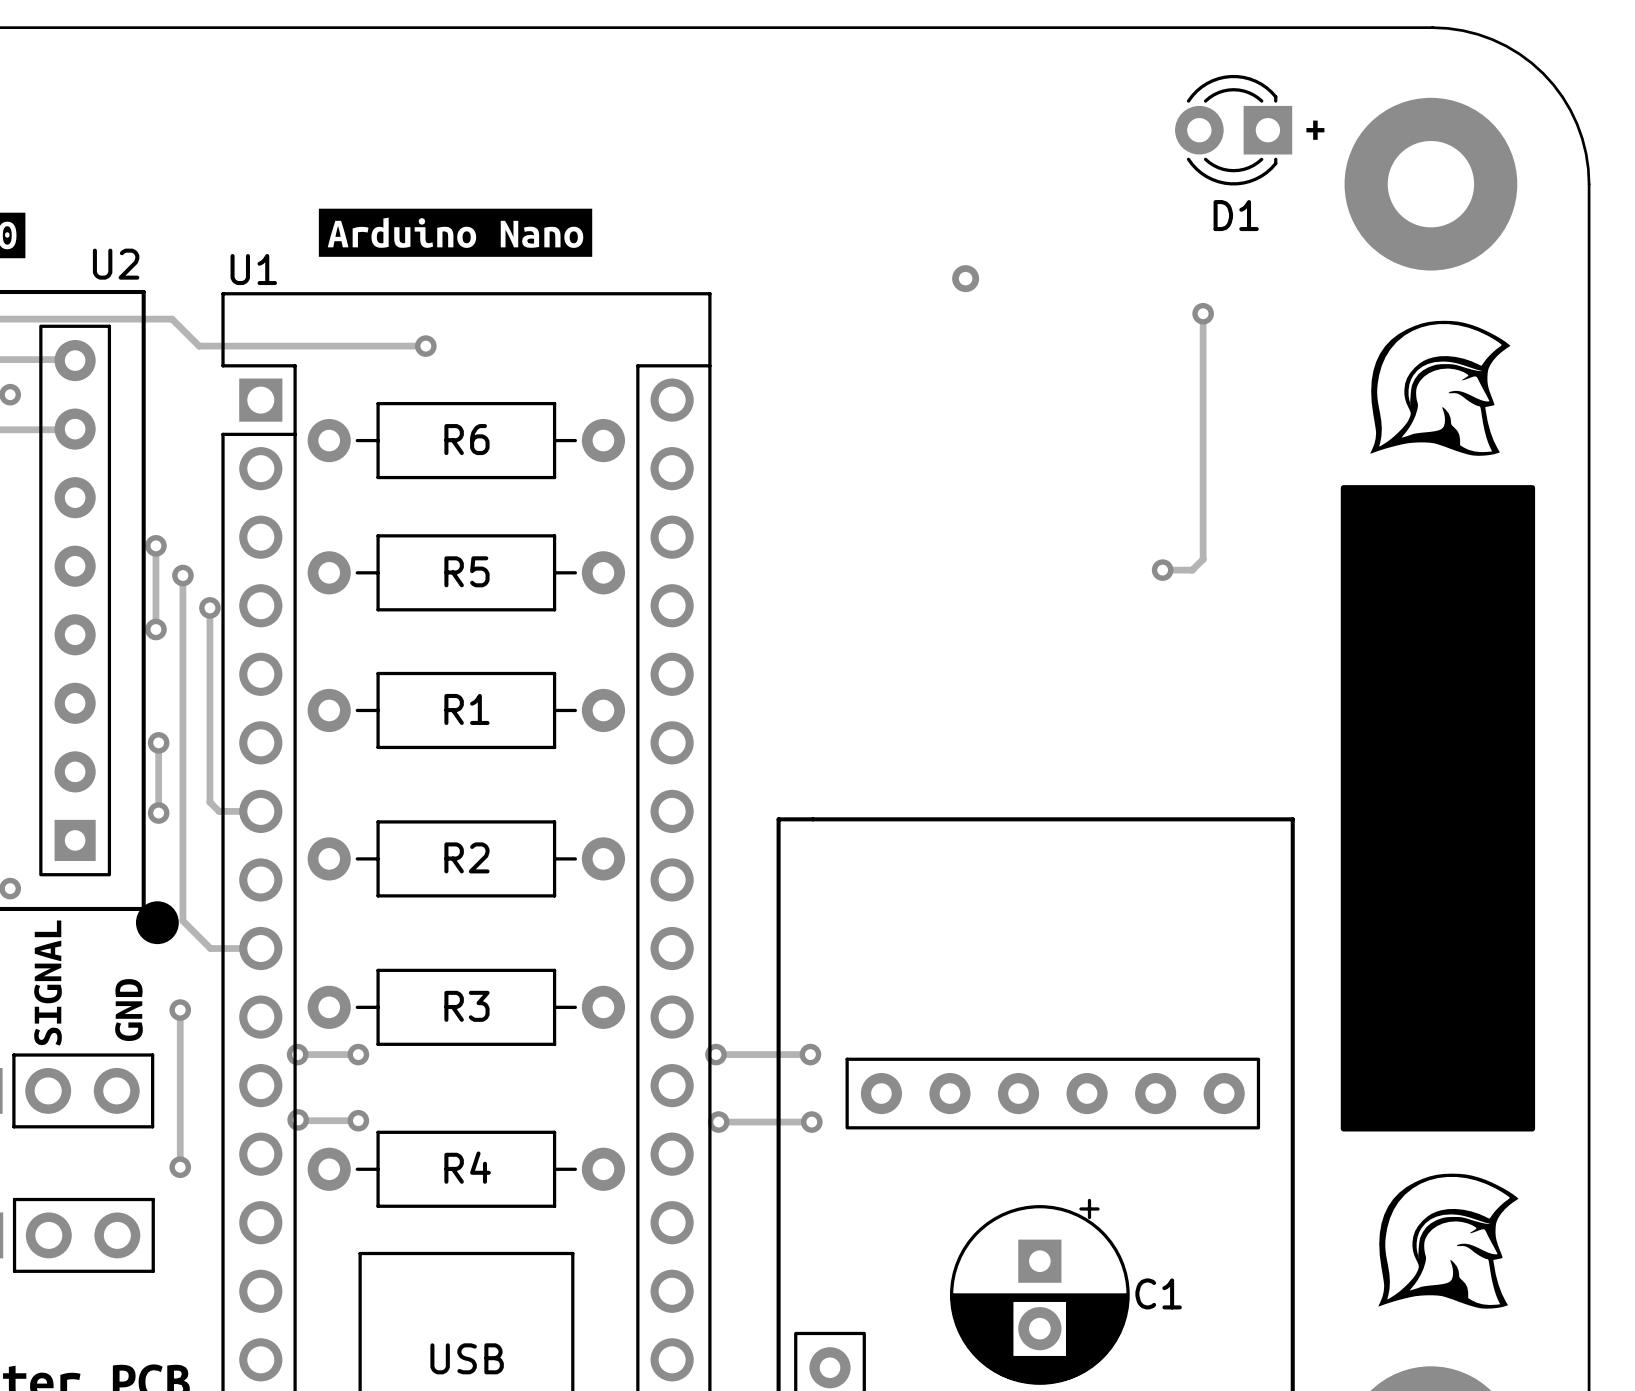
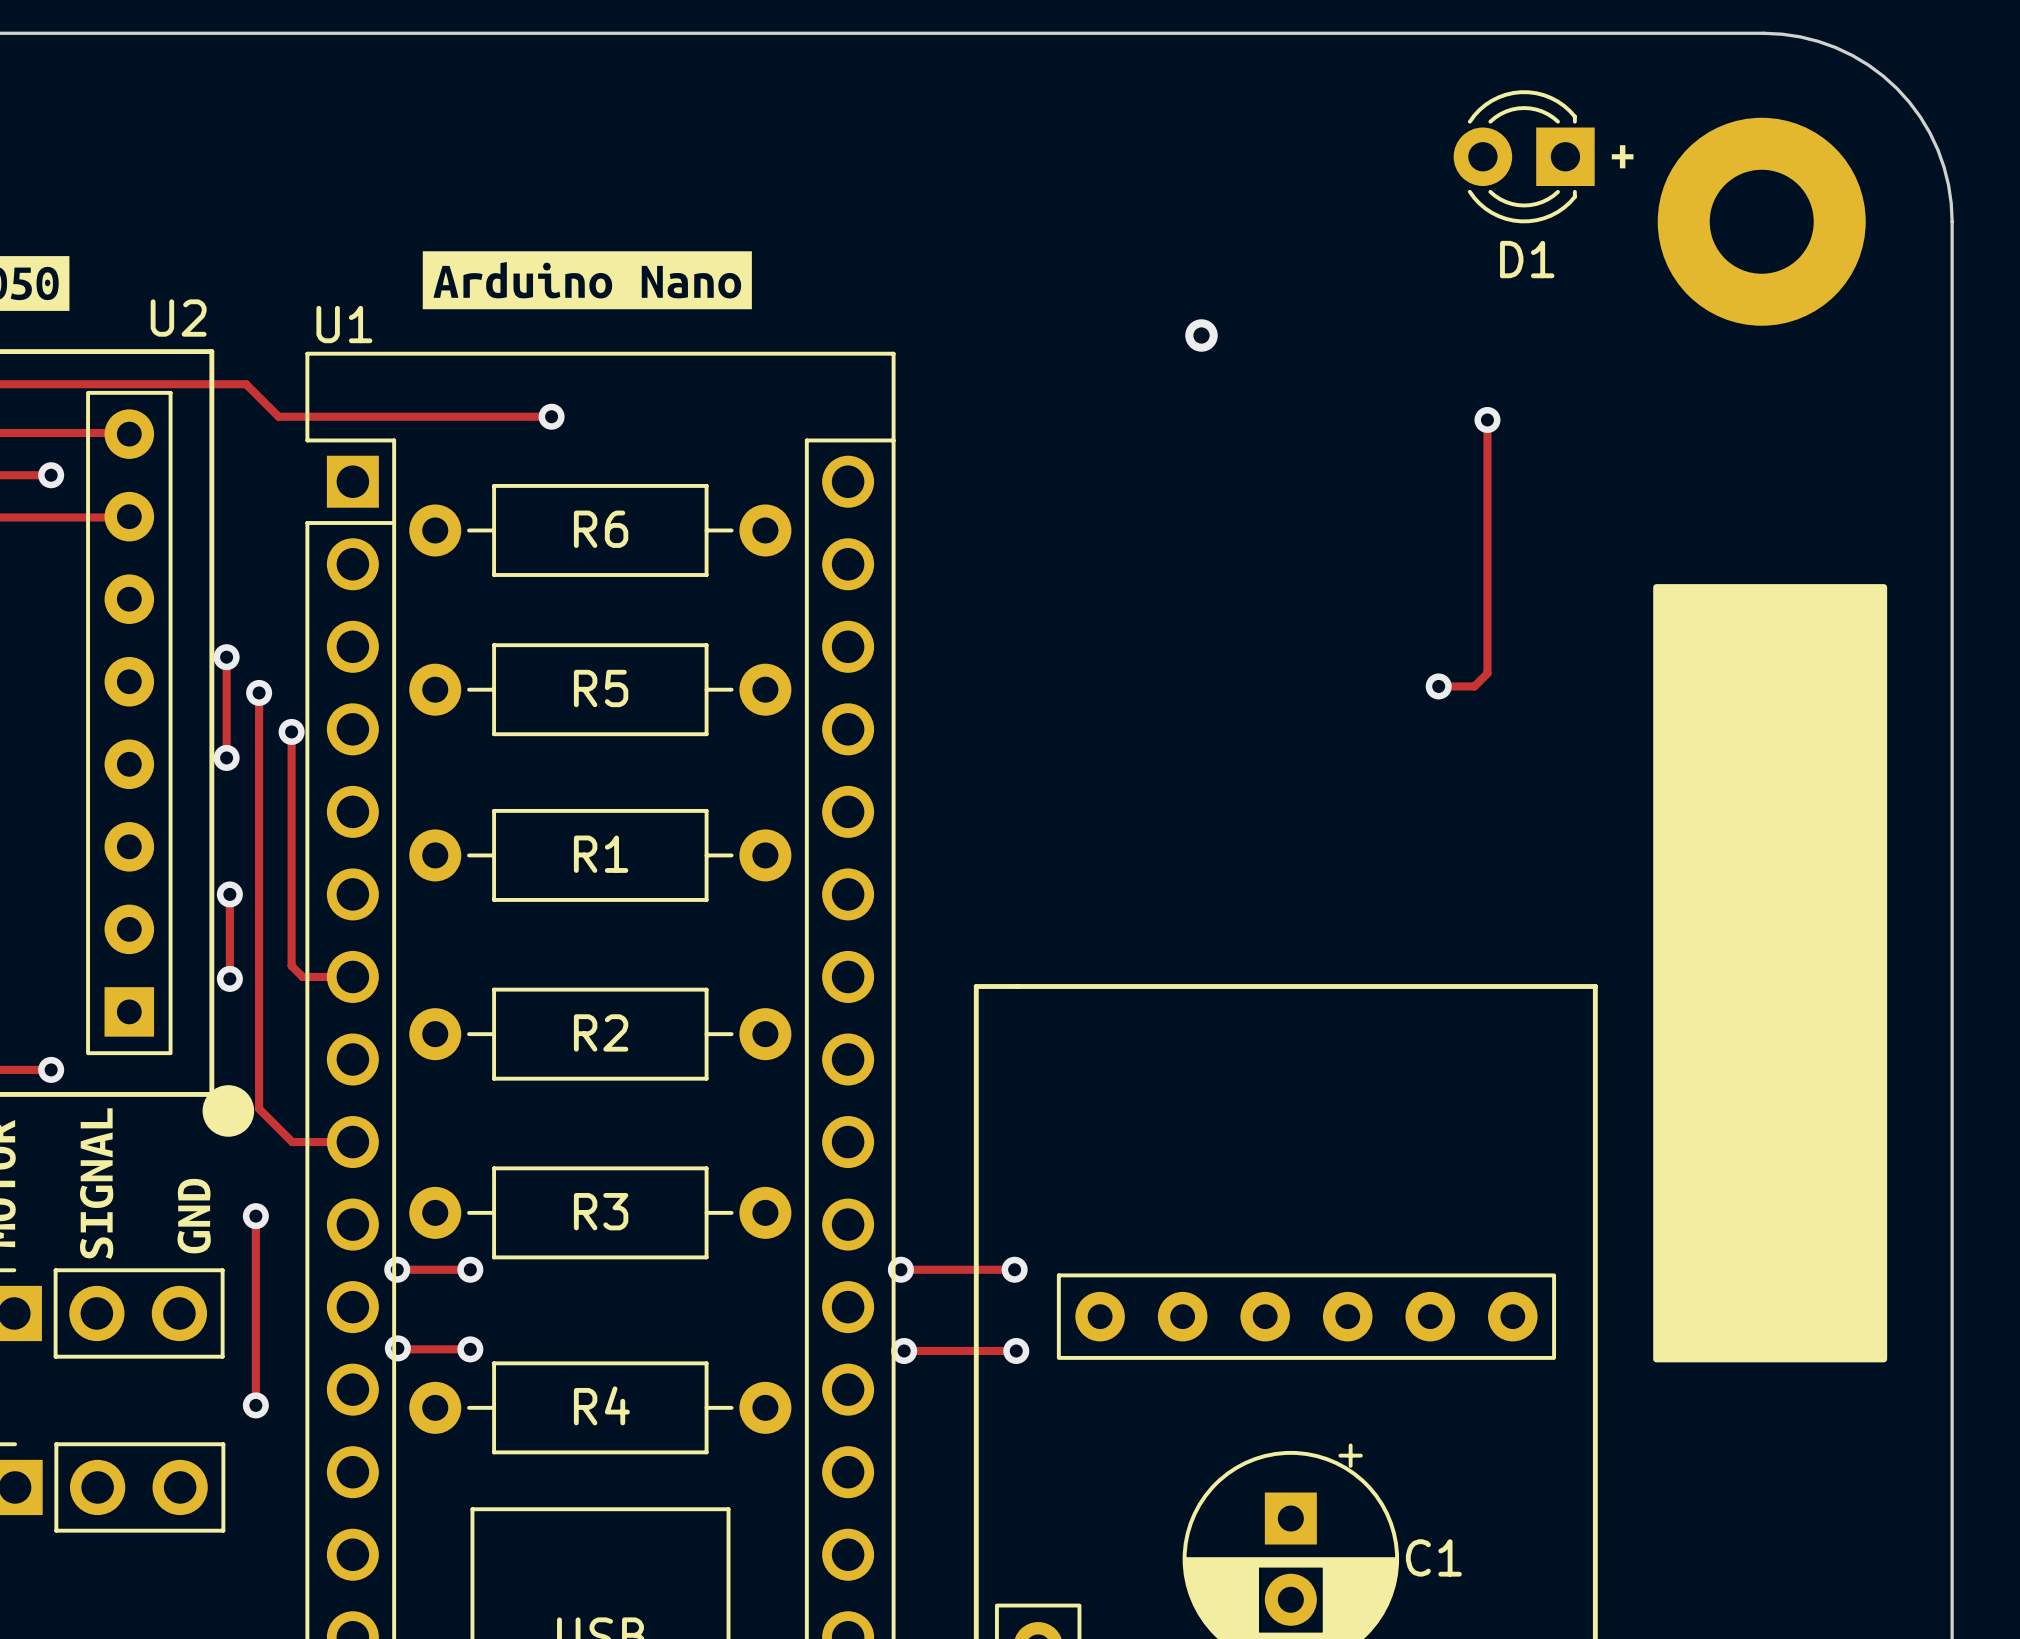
track: (1203, 313) (1203, 348) -> none
via position: (1203, 313) -> (1487, 419)
drawing: [1370, 320, 1511, 456] -> none
drawing: [1378, 1173, 1519, 1309] -> none

